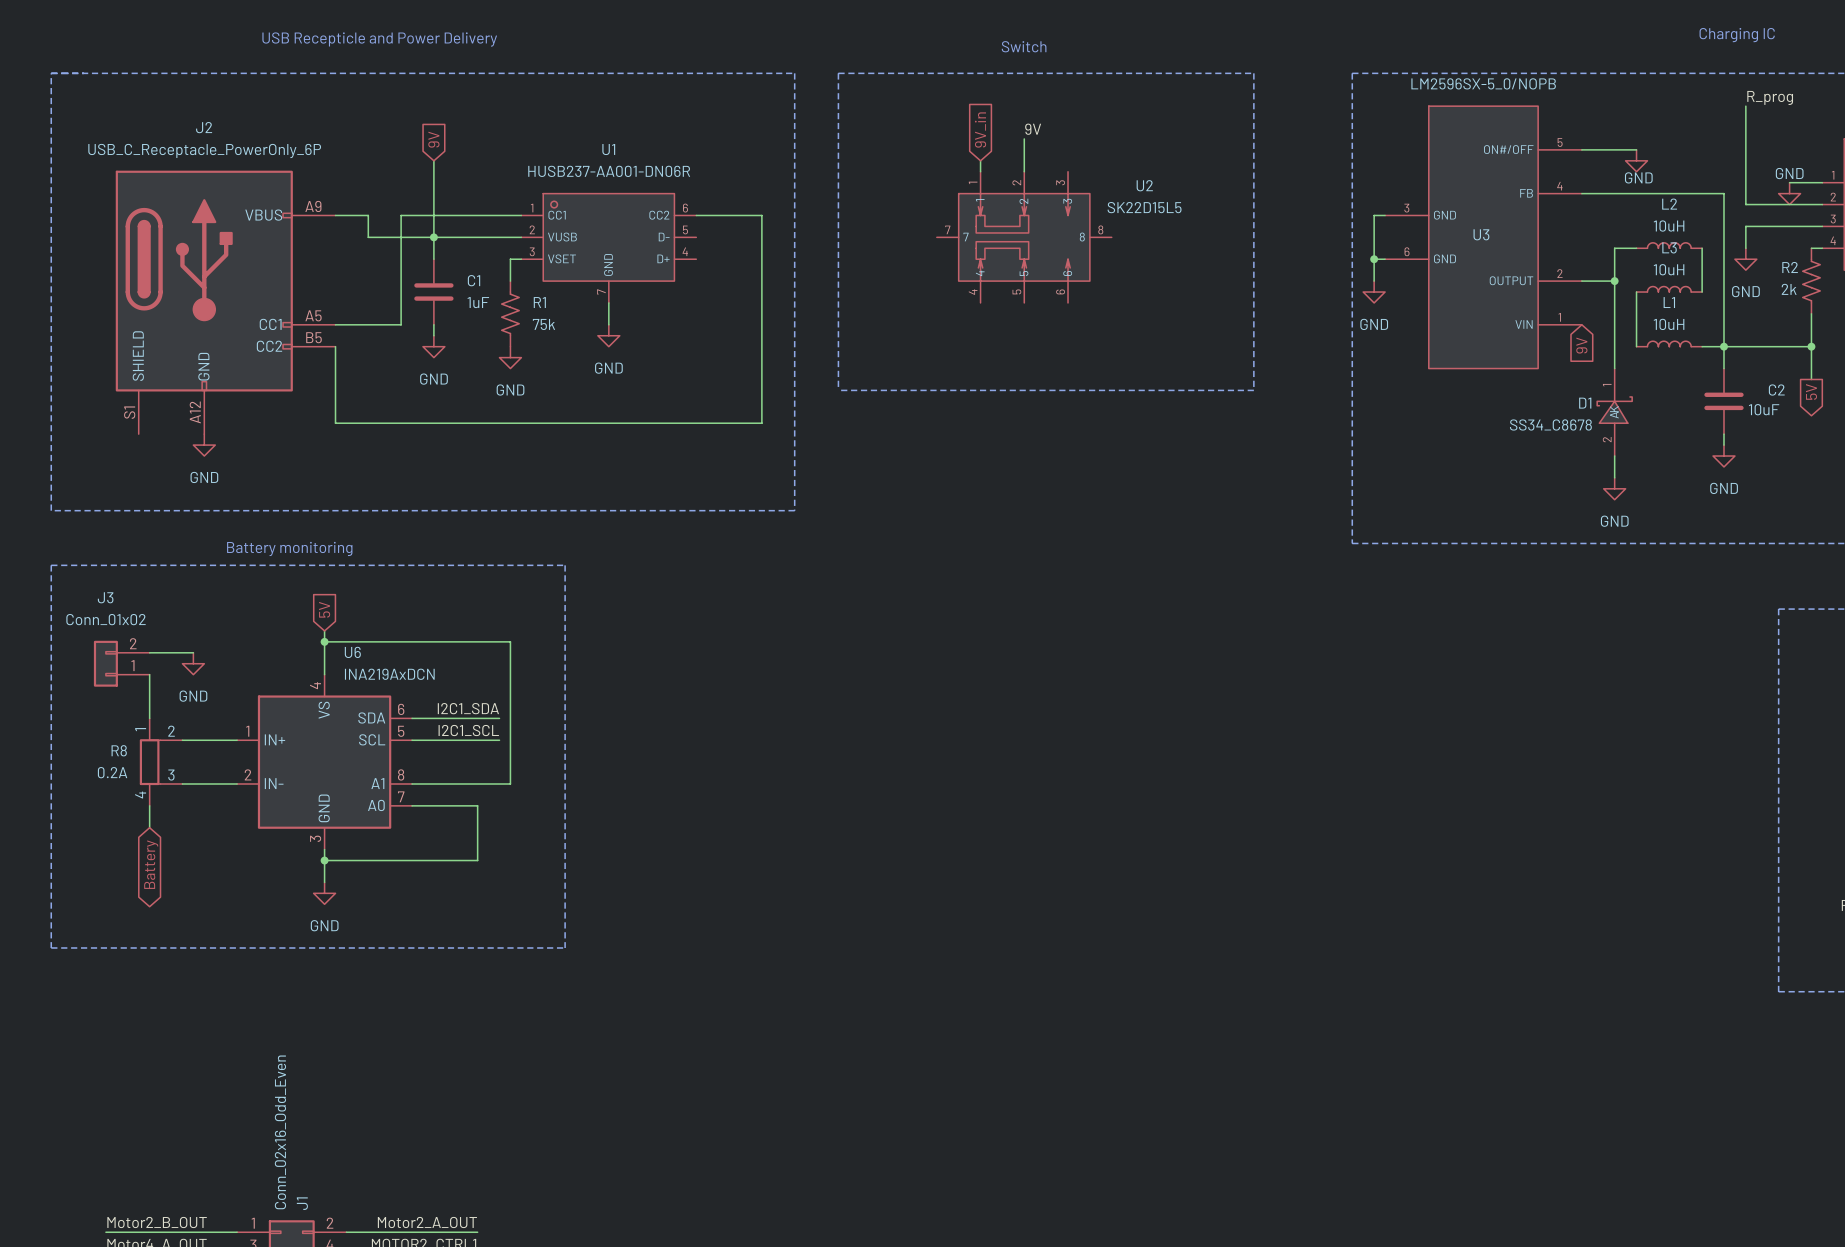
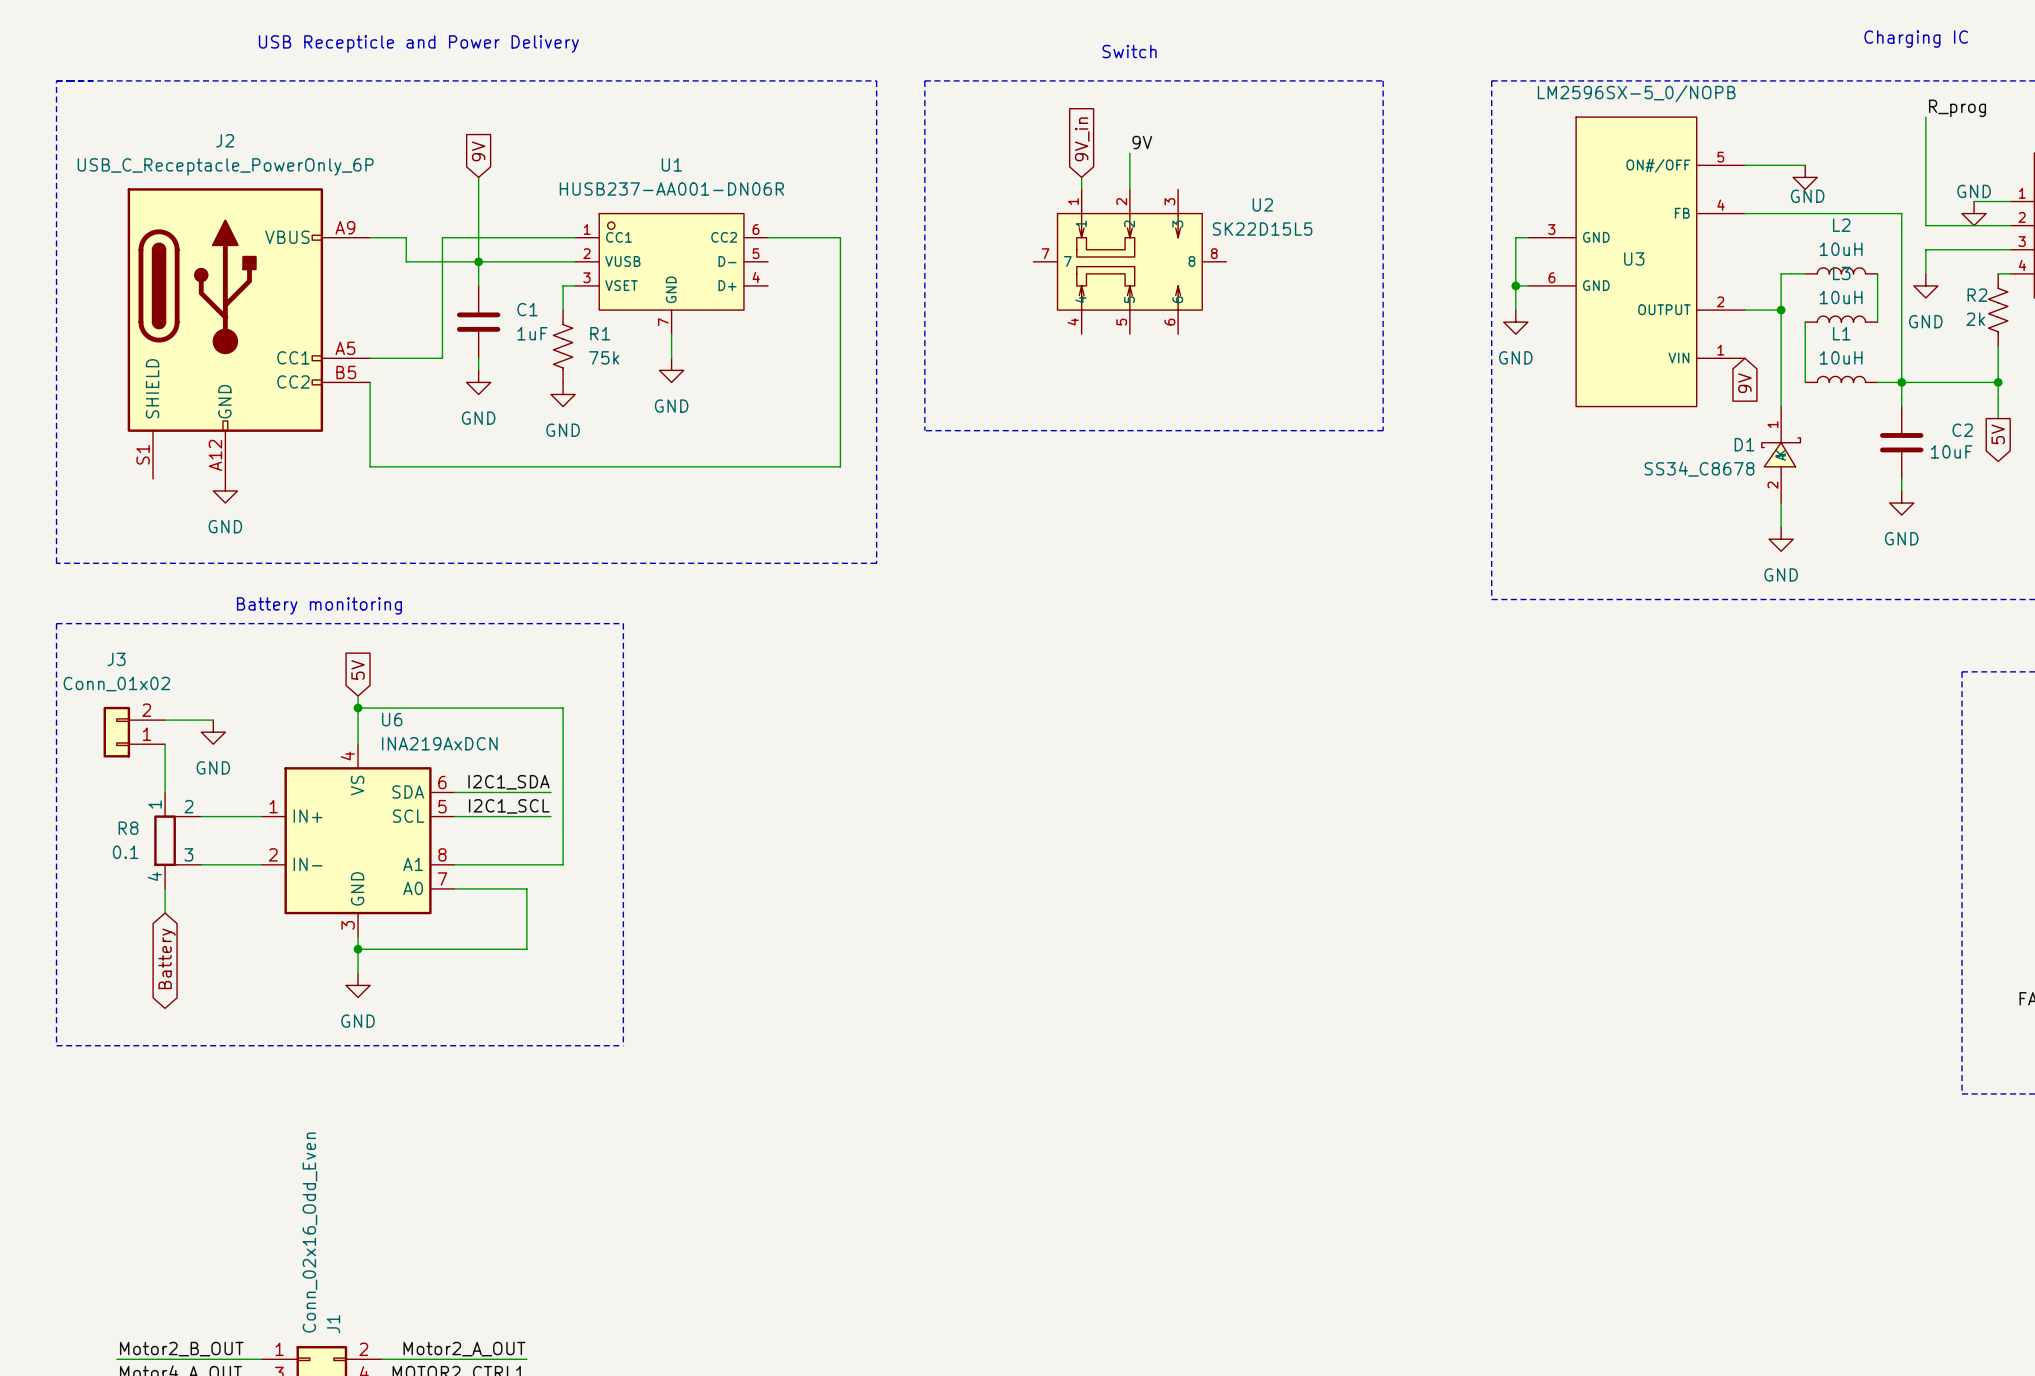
R8 value: 0.2A (112, 772) -> 0.1 (125, 852)

